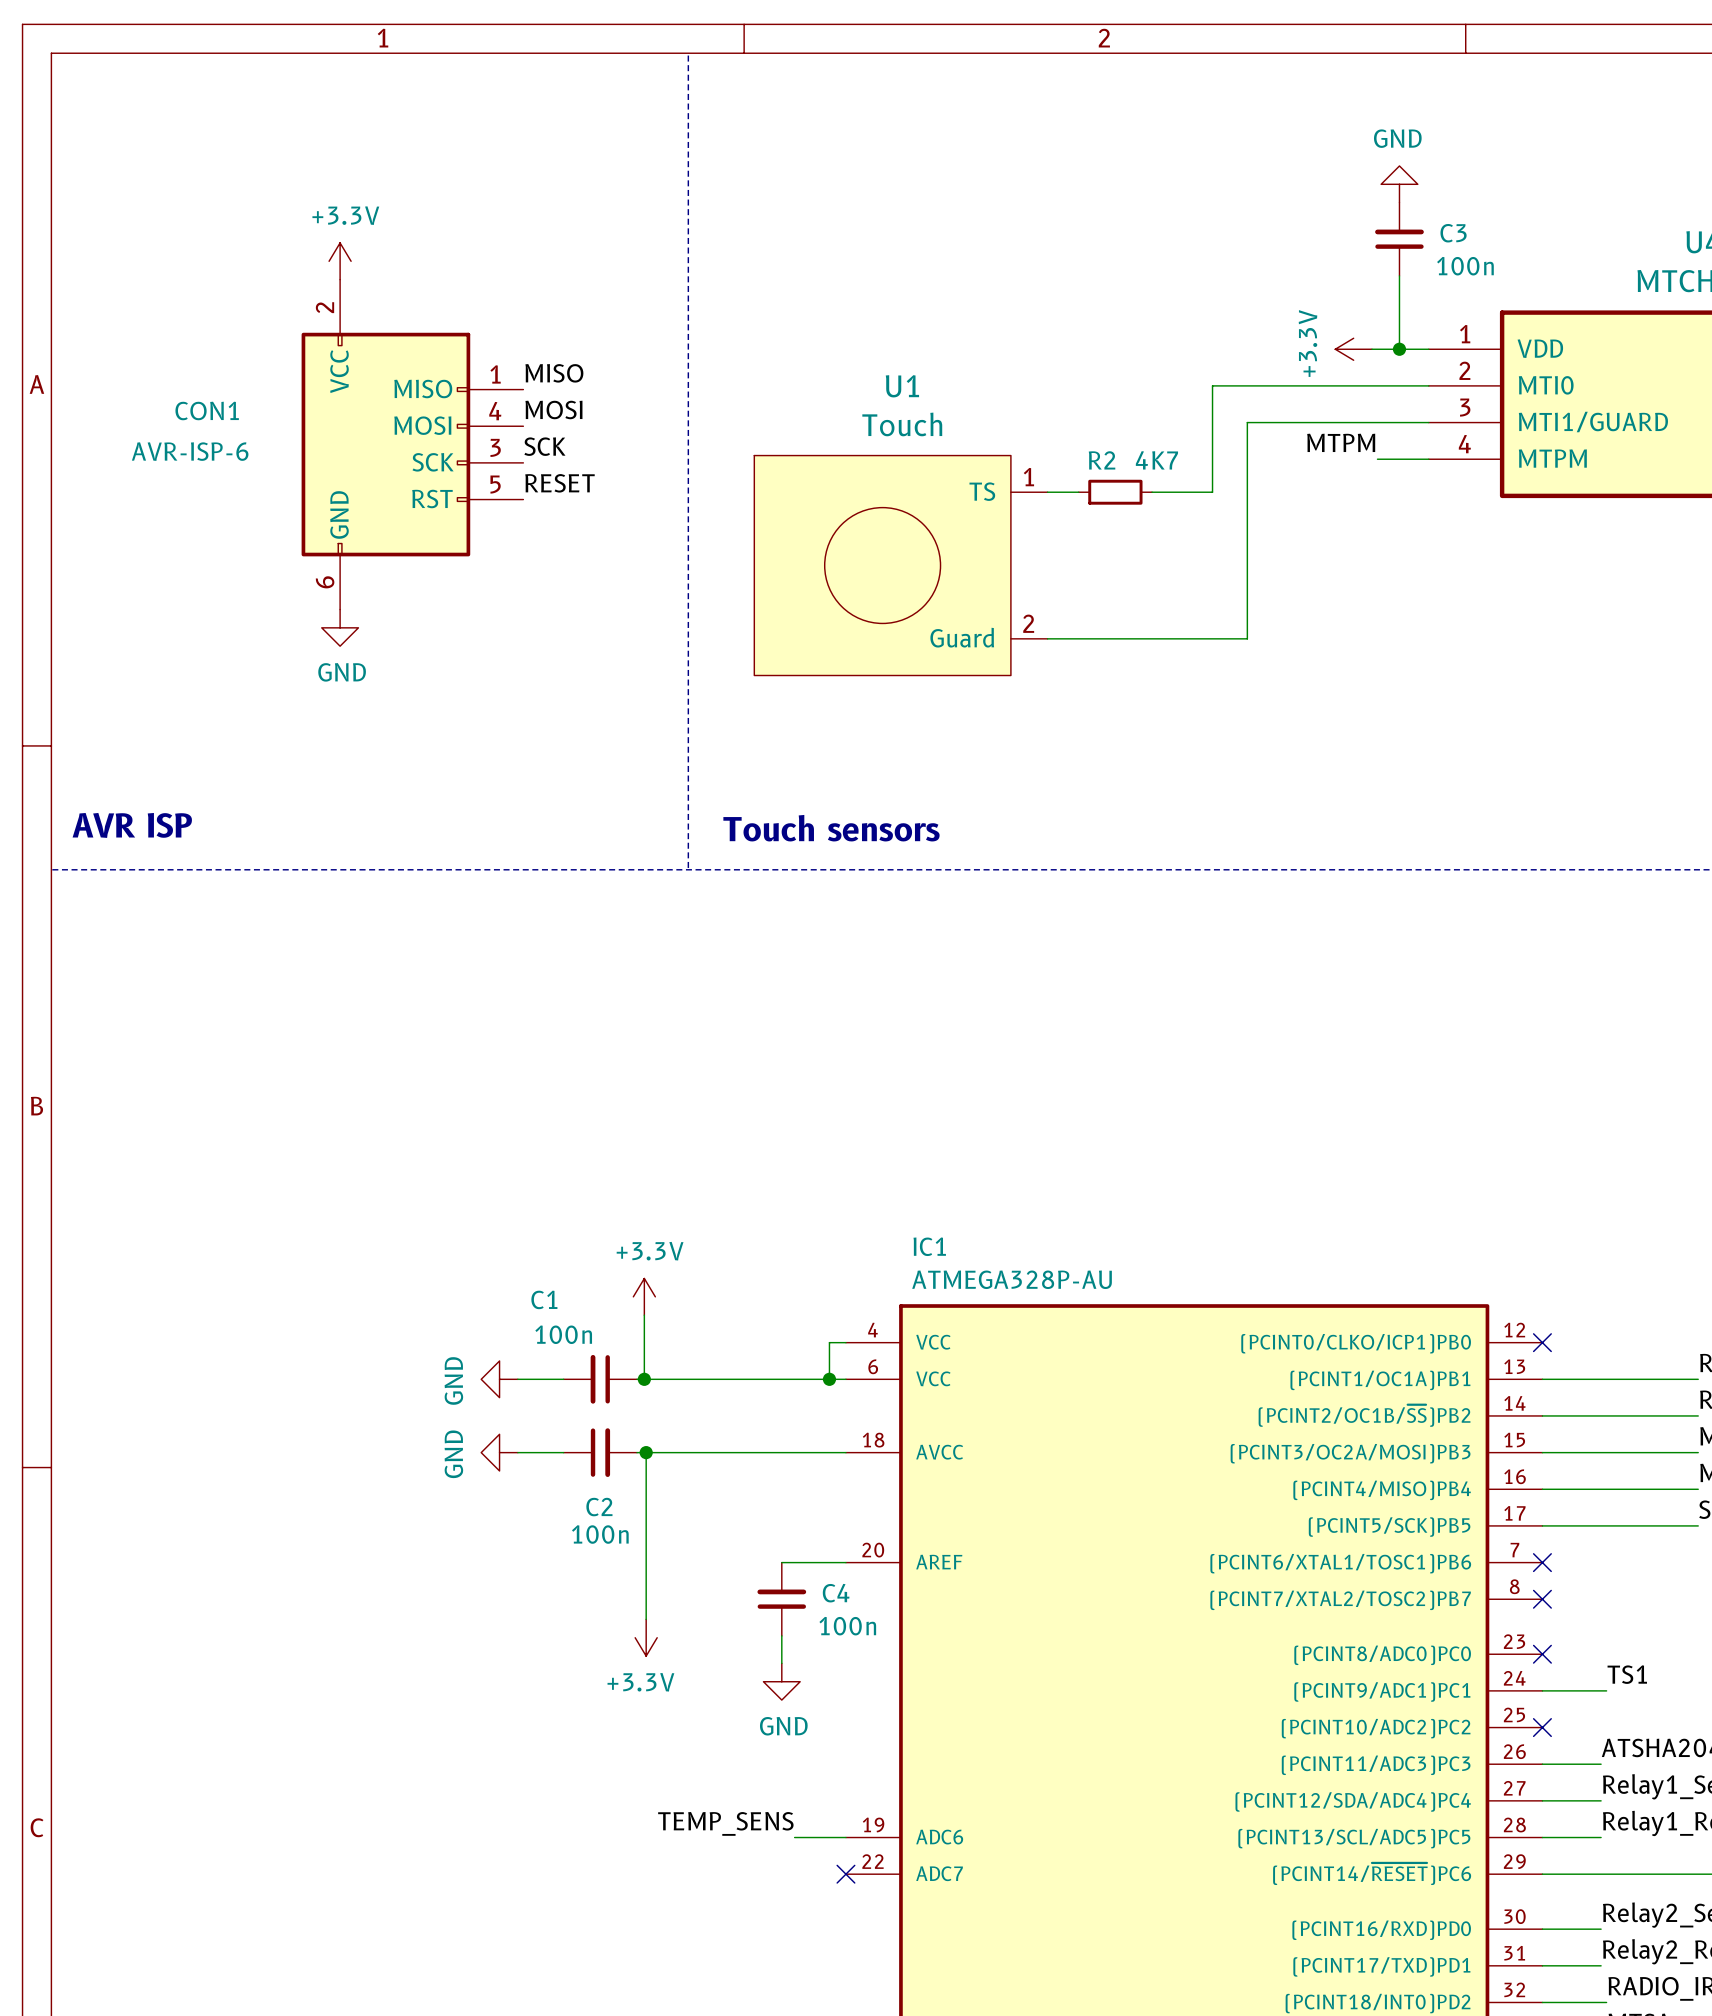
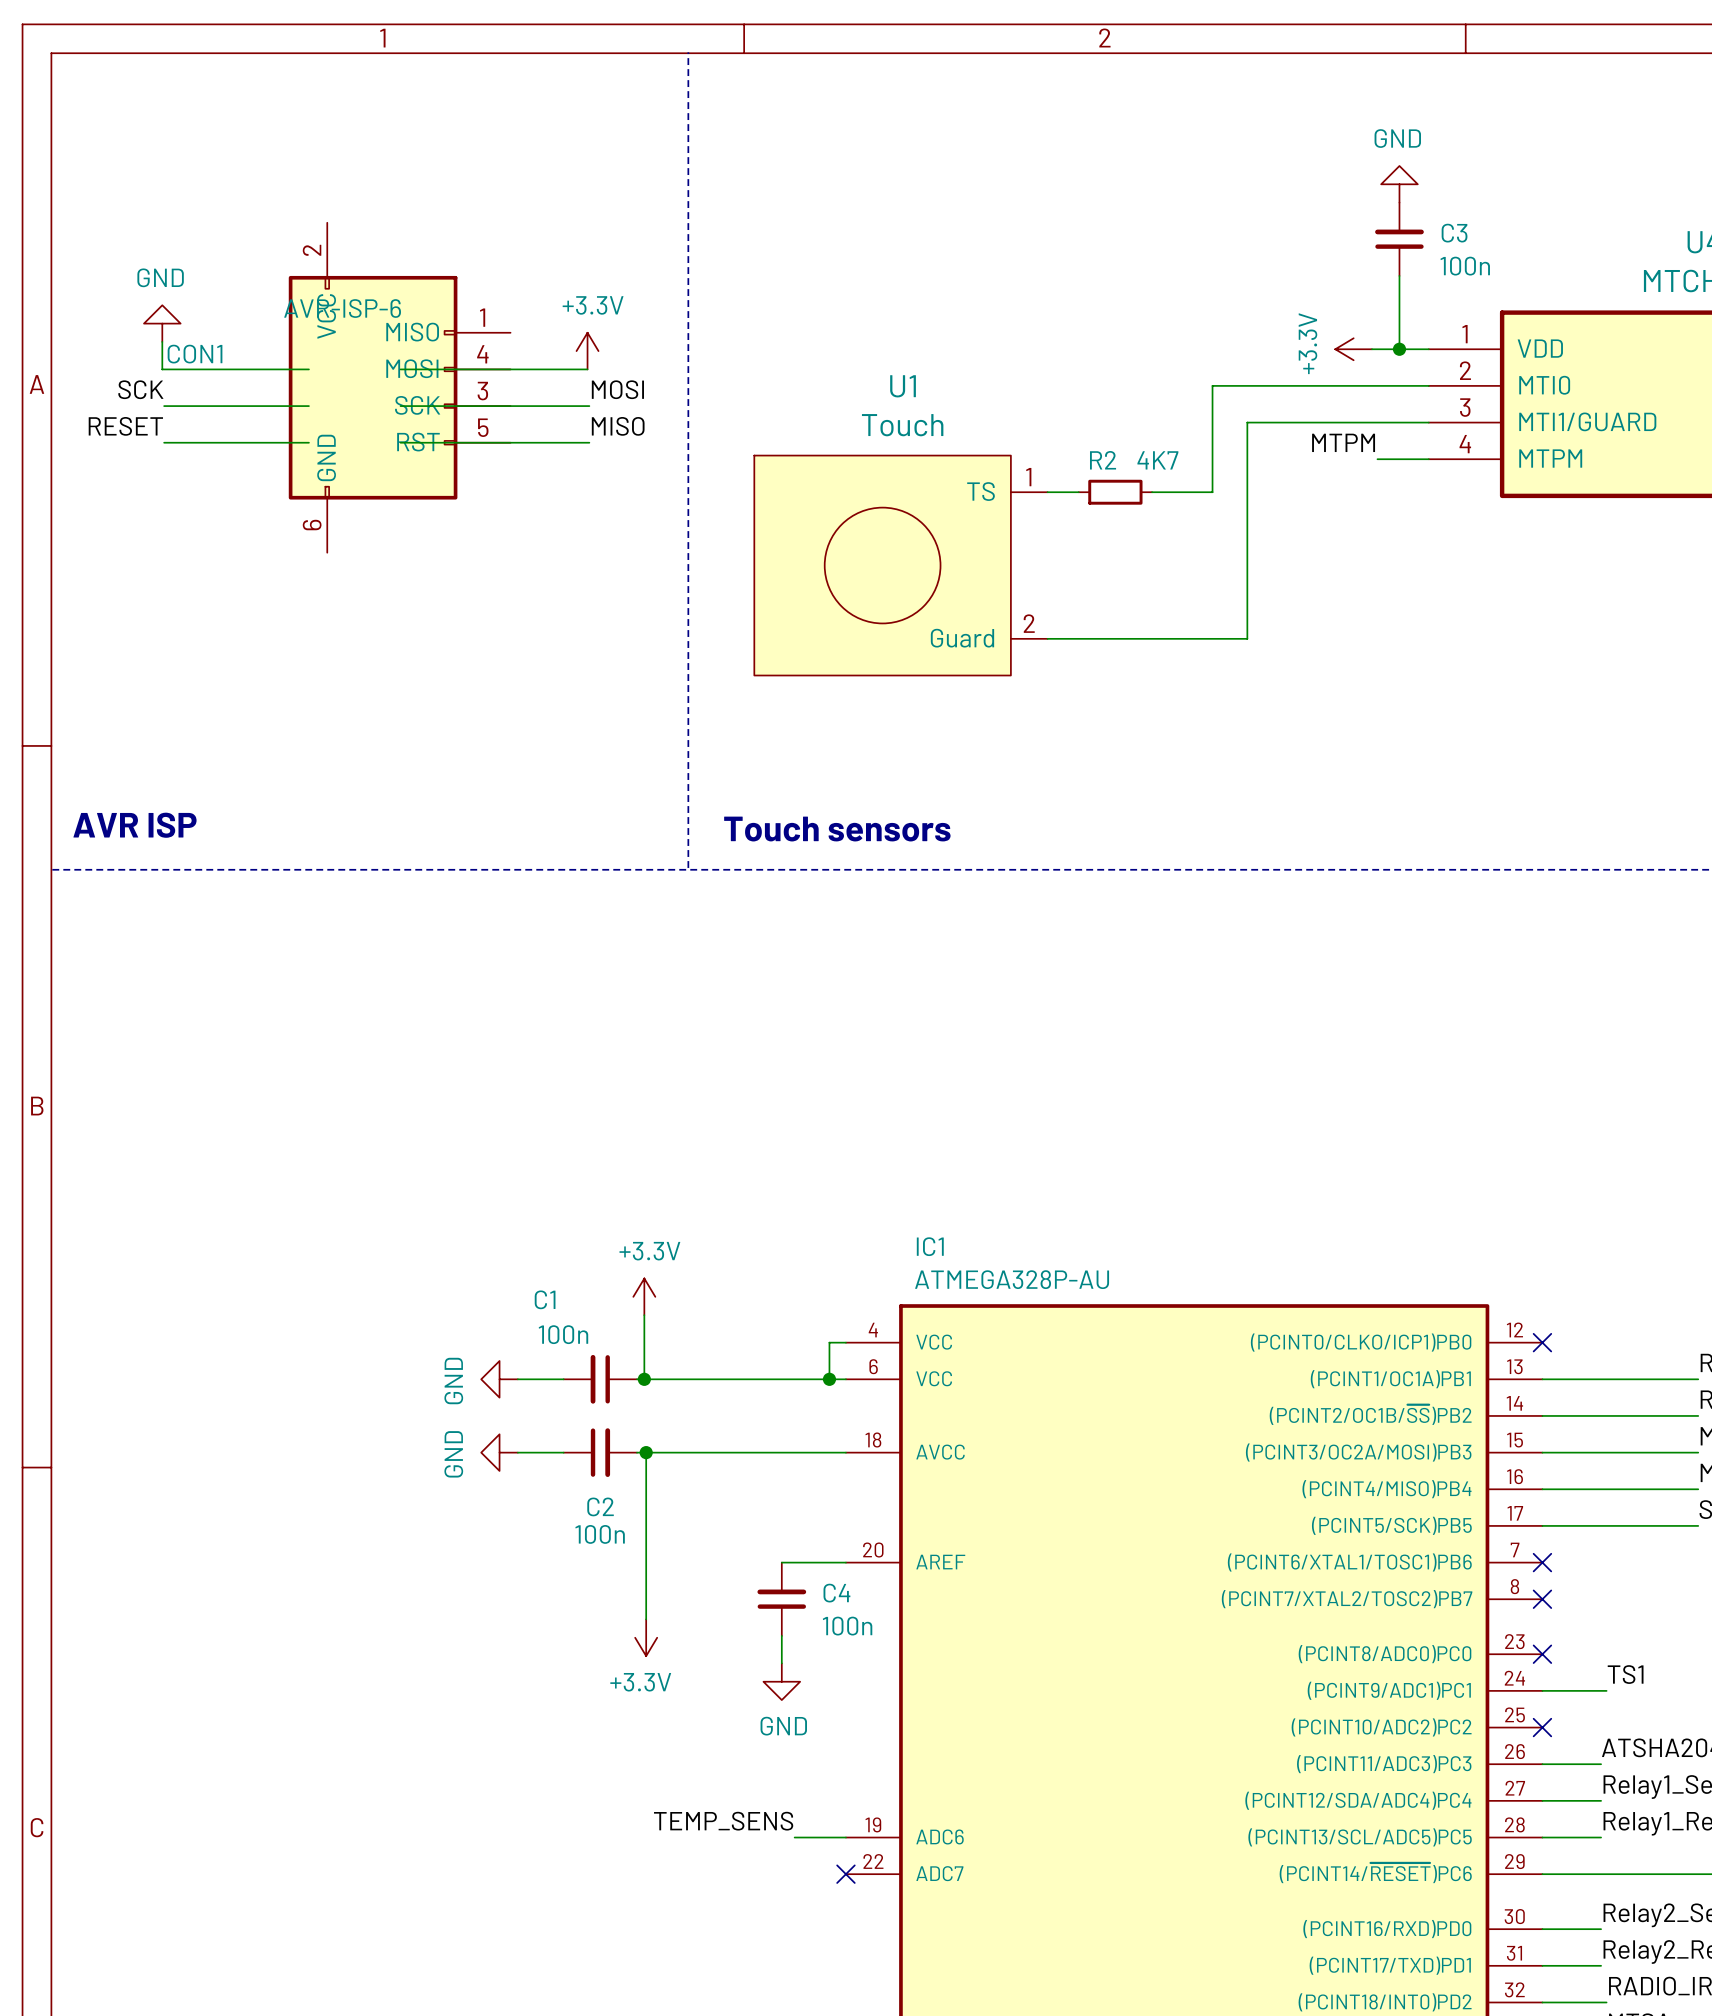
power symbol position: +3.3V (340, 261) -> +3.3V (587, 351)
wire: none -> (162, 341) (162, 369) (308, 369)
wire: none -> (400, 369) (587, 369)
label position: MISO (554, 373) -> MISO (618, 426)
label: none -> SCK (140, 389)
wire: none -> (164, 406) (308, 406)
wire: none -> (400, 406) (589, 406)
label position: MOSI (553, 409) -> MOSI (617, 389)
label: none -> RESET (125, 426)
wire: none -> (164, 442) (308, 442)
wire: none -> (400, 442) (589, 442)
CON1 position: (412, 444) -> (399, 387)
label: SCK (544, 446) -> none
CON1 value position: AVR-ISP-6 (190, 451) -> AVR-ISP-6 (342, 308)
label: RESET (559, 483) -> none
power symbol rotation: 0° (340, 627) -> 180° (162, 323)
power symbol position: GND (340, 627) -> GND (162, 323)

